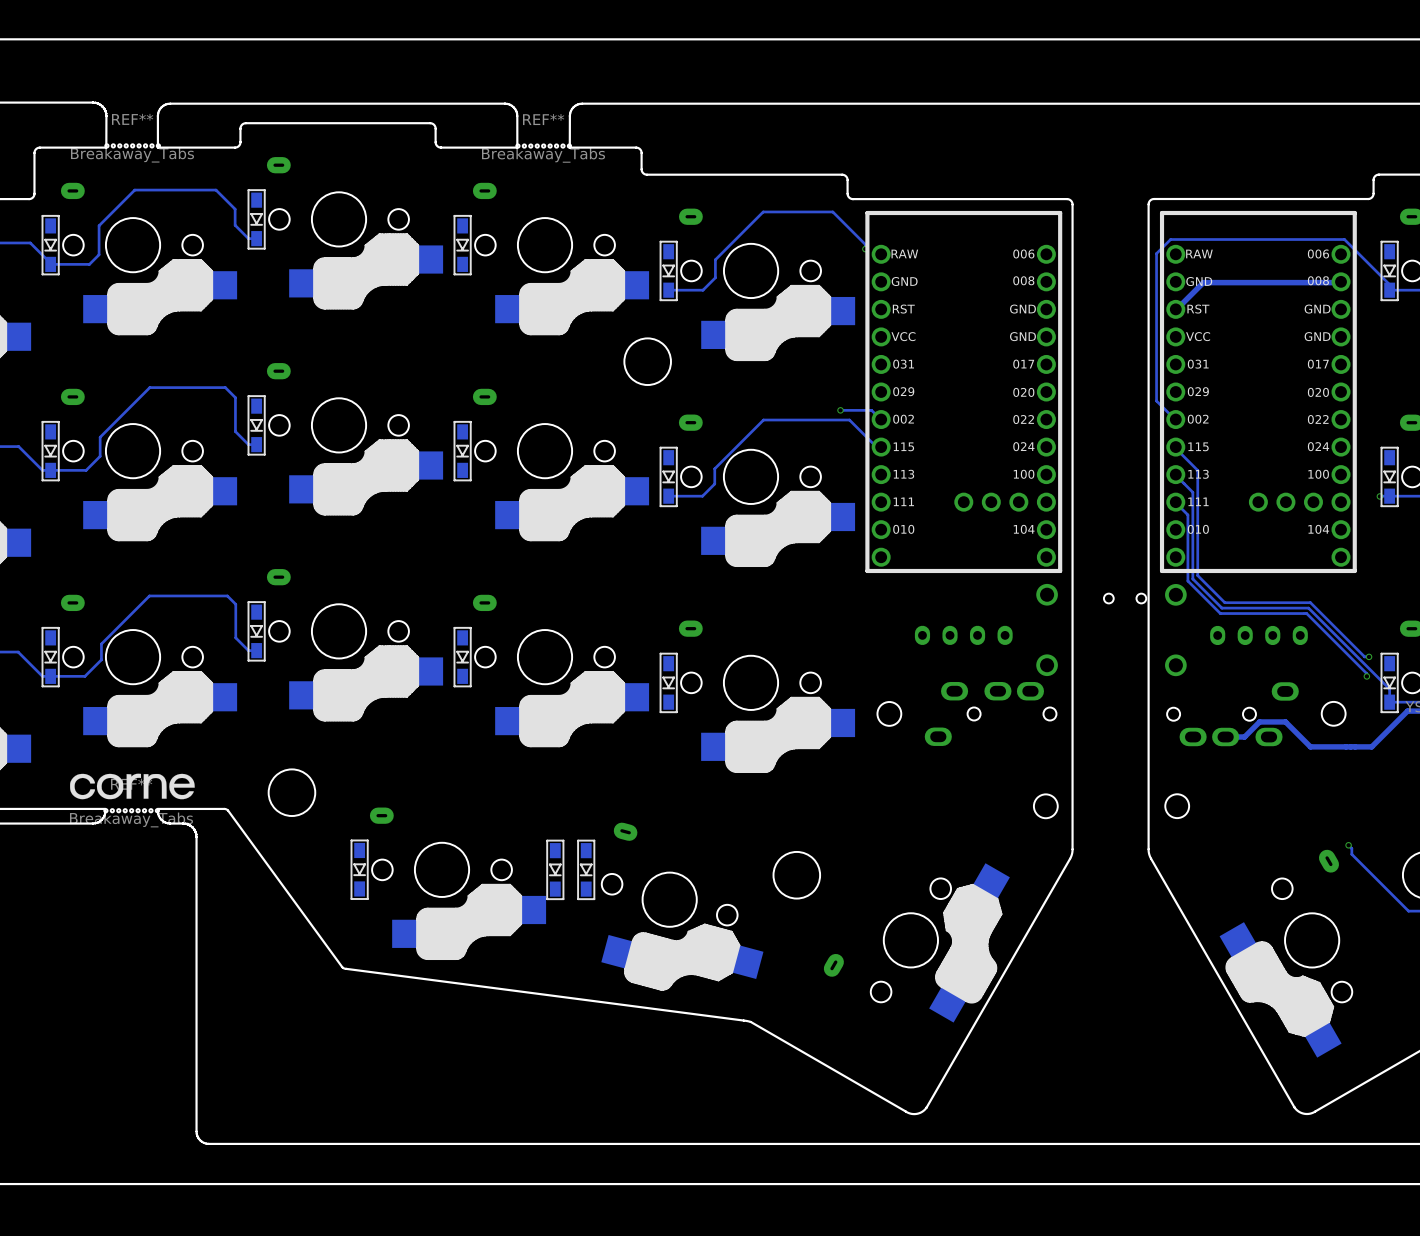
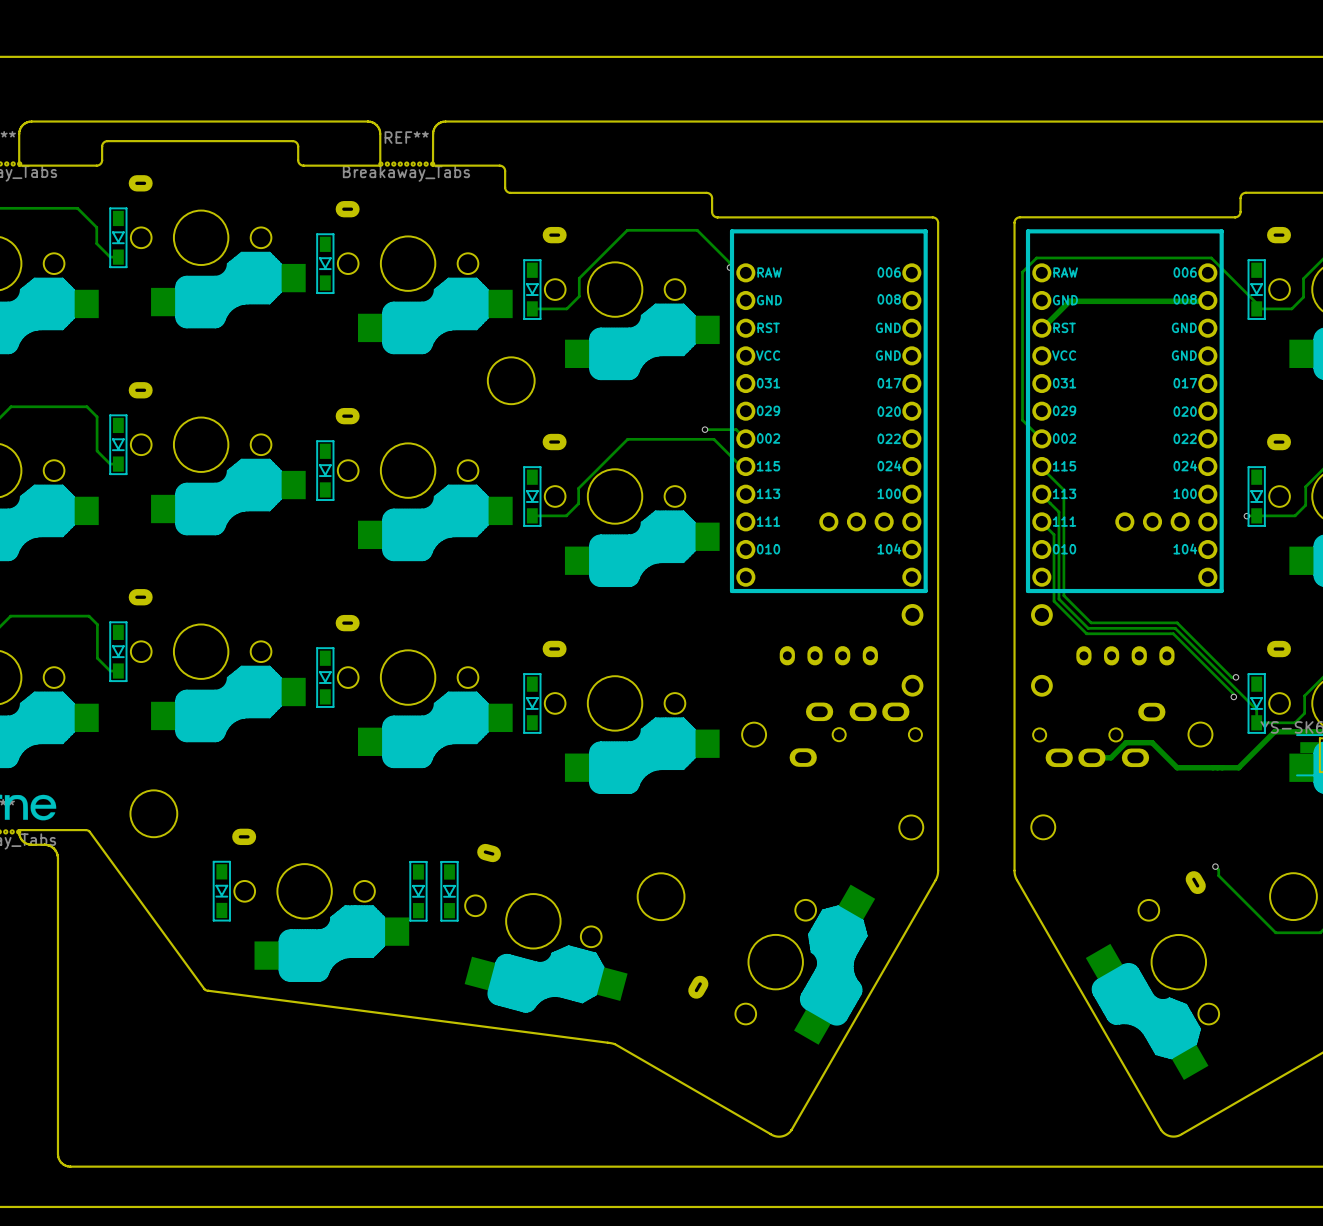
part: (1125, 598) -> none

